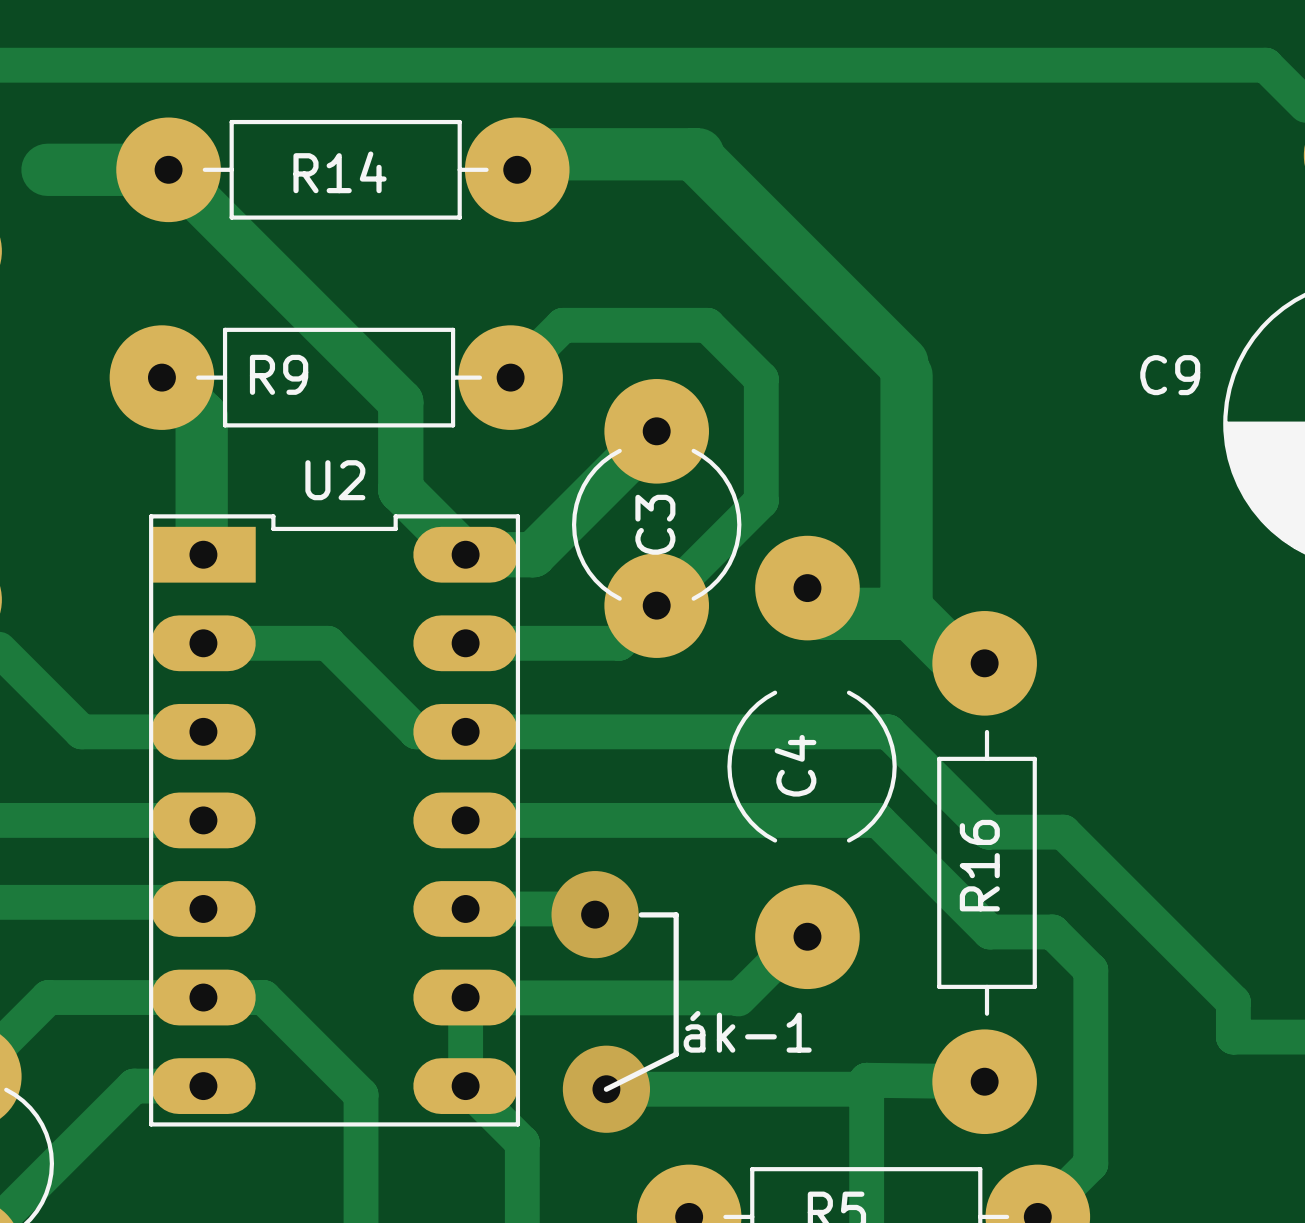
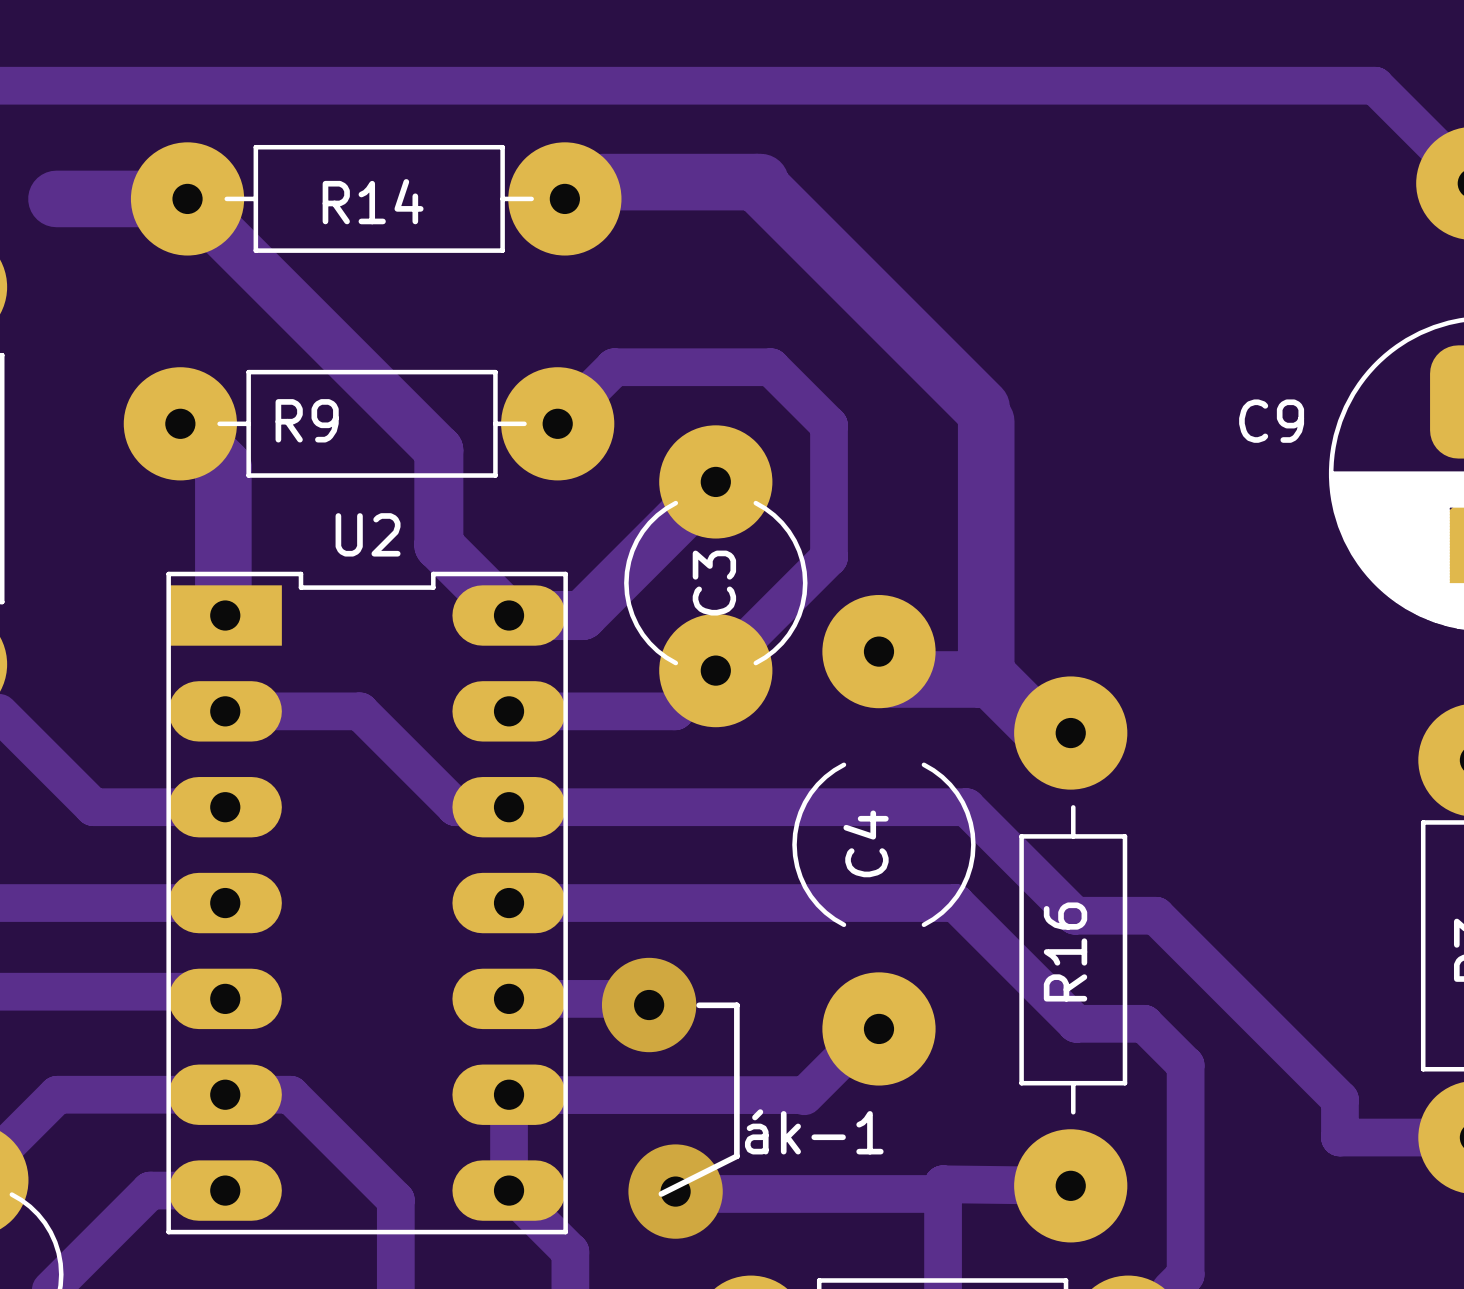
via position: (606, 1089) -> (675, 1191)

